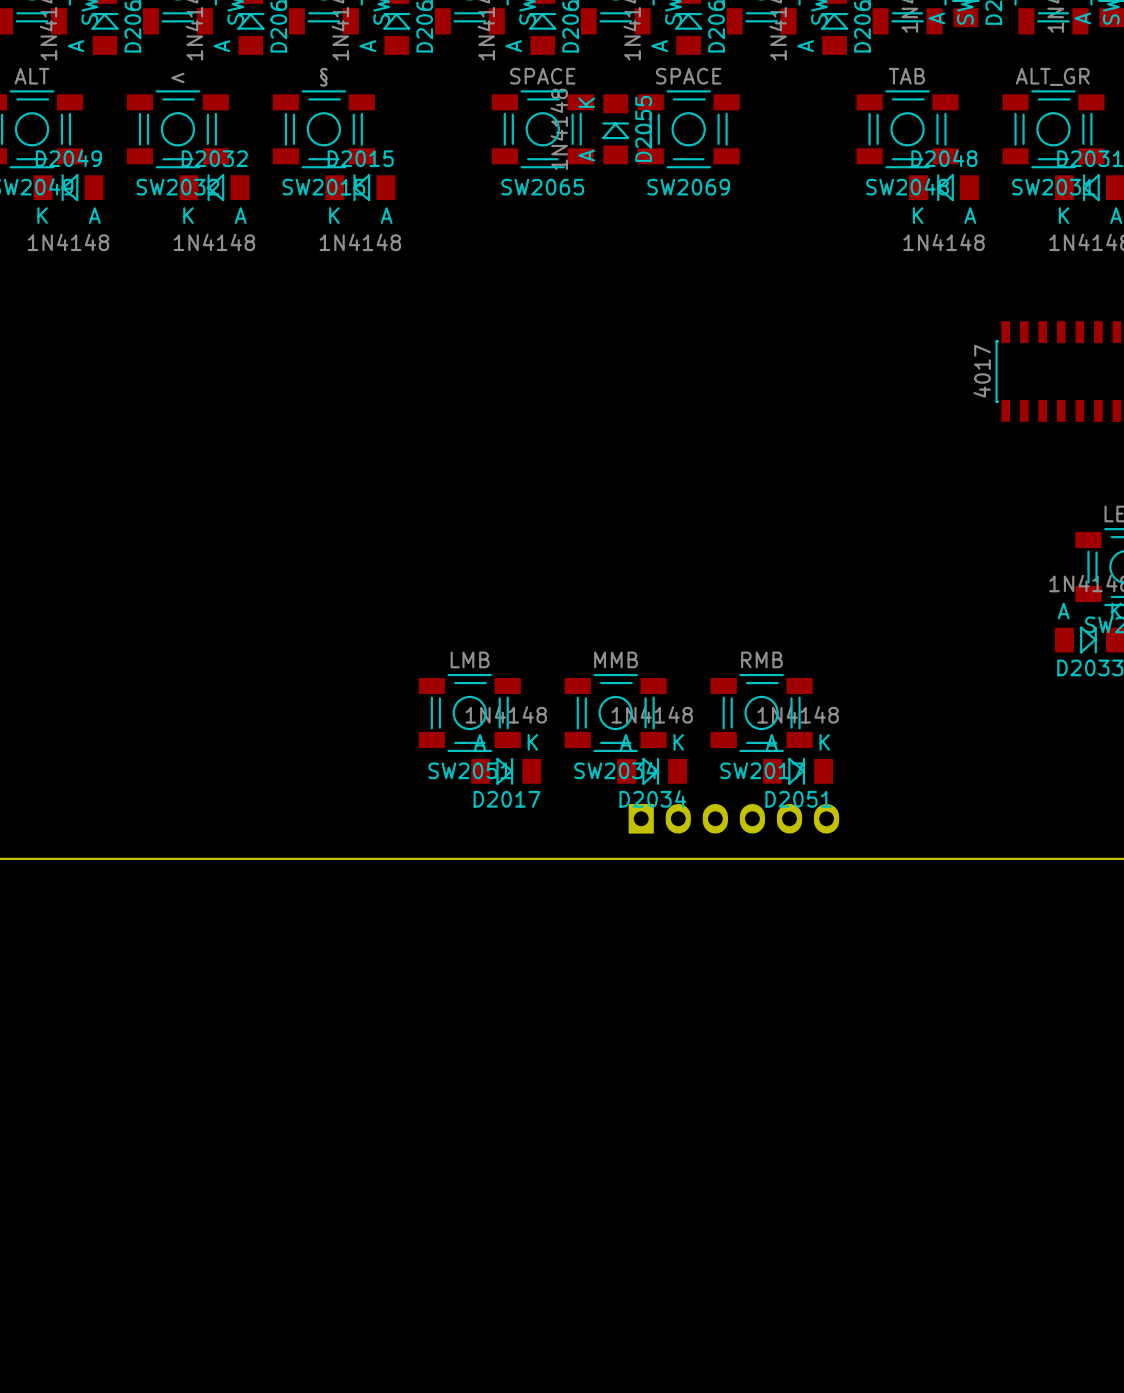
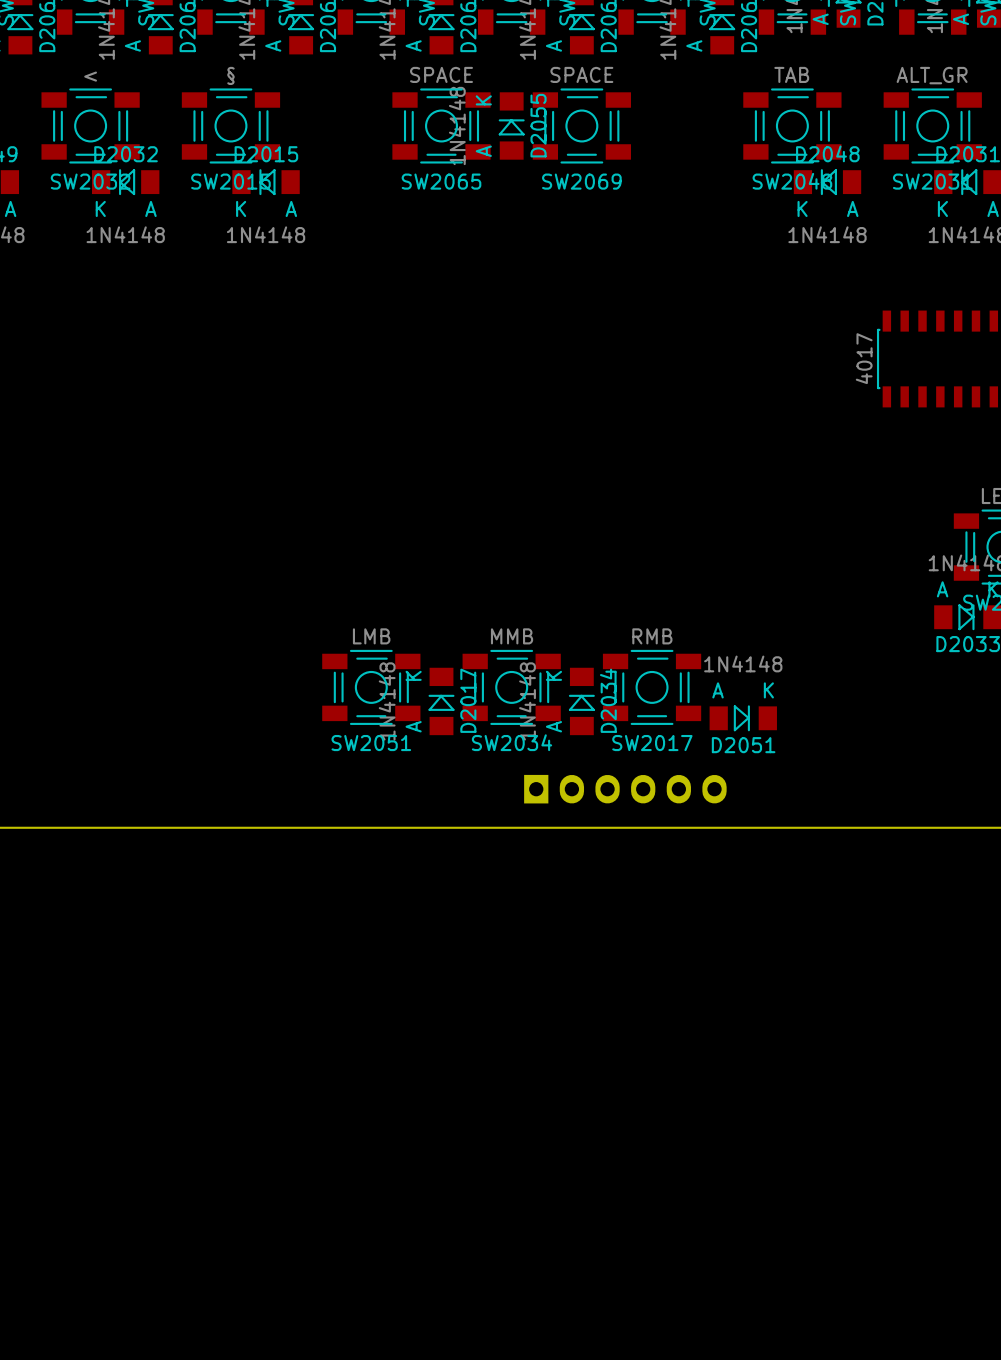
D2017 rotation: 0° (506, 771) -> 90° counterclockwise (441, 701)
D2017 position: (506, 771) -> (441, 701)
D2034 rotation: 0° (652, 771) -> 90° counterclockwise (581, 701)
D2034 position: (652, 771) -> (581, 701)
D2051 position: (798, 771) -> (743, 718)

